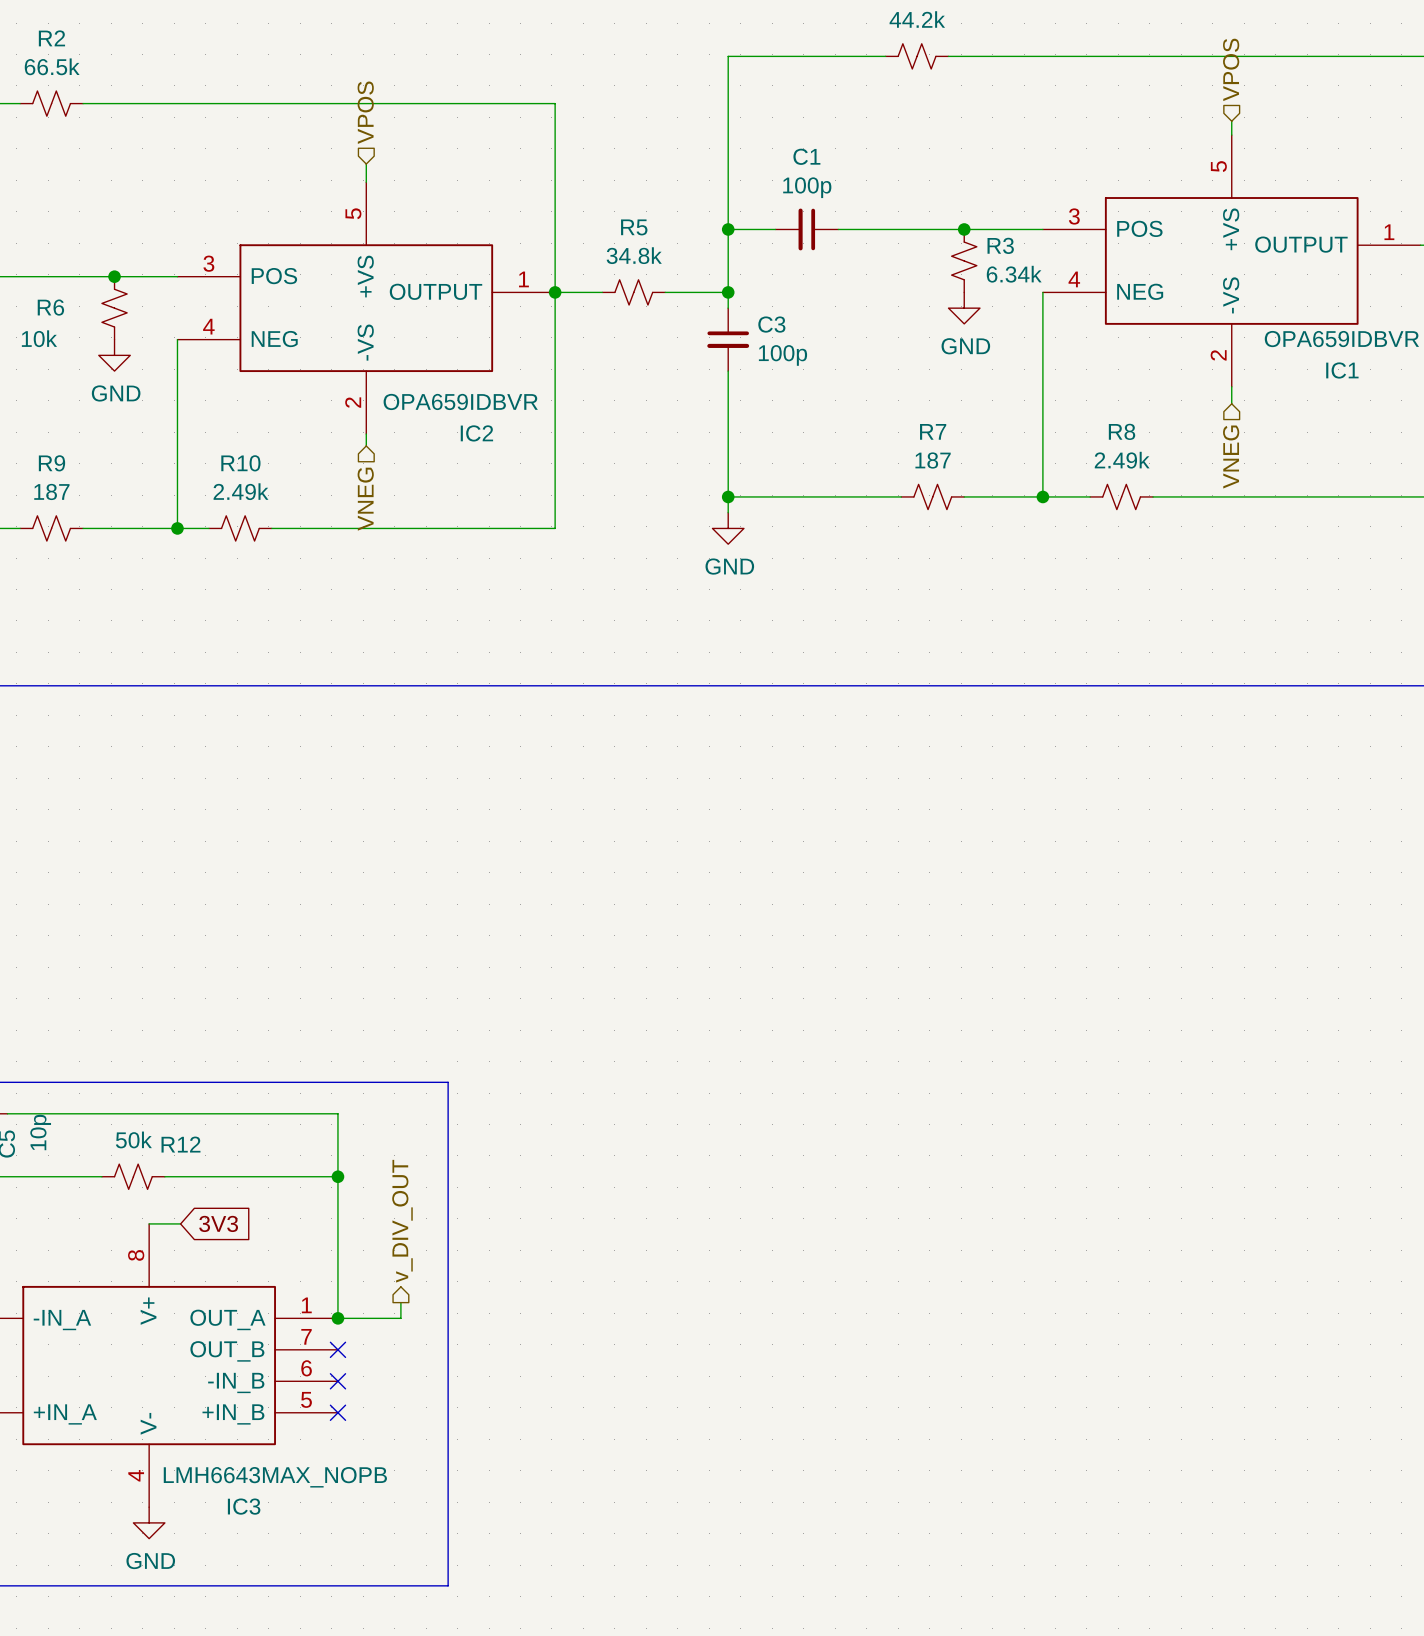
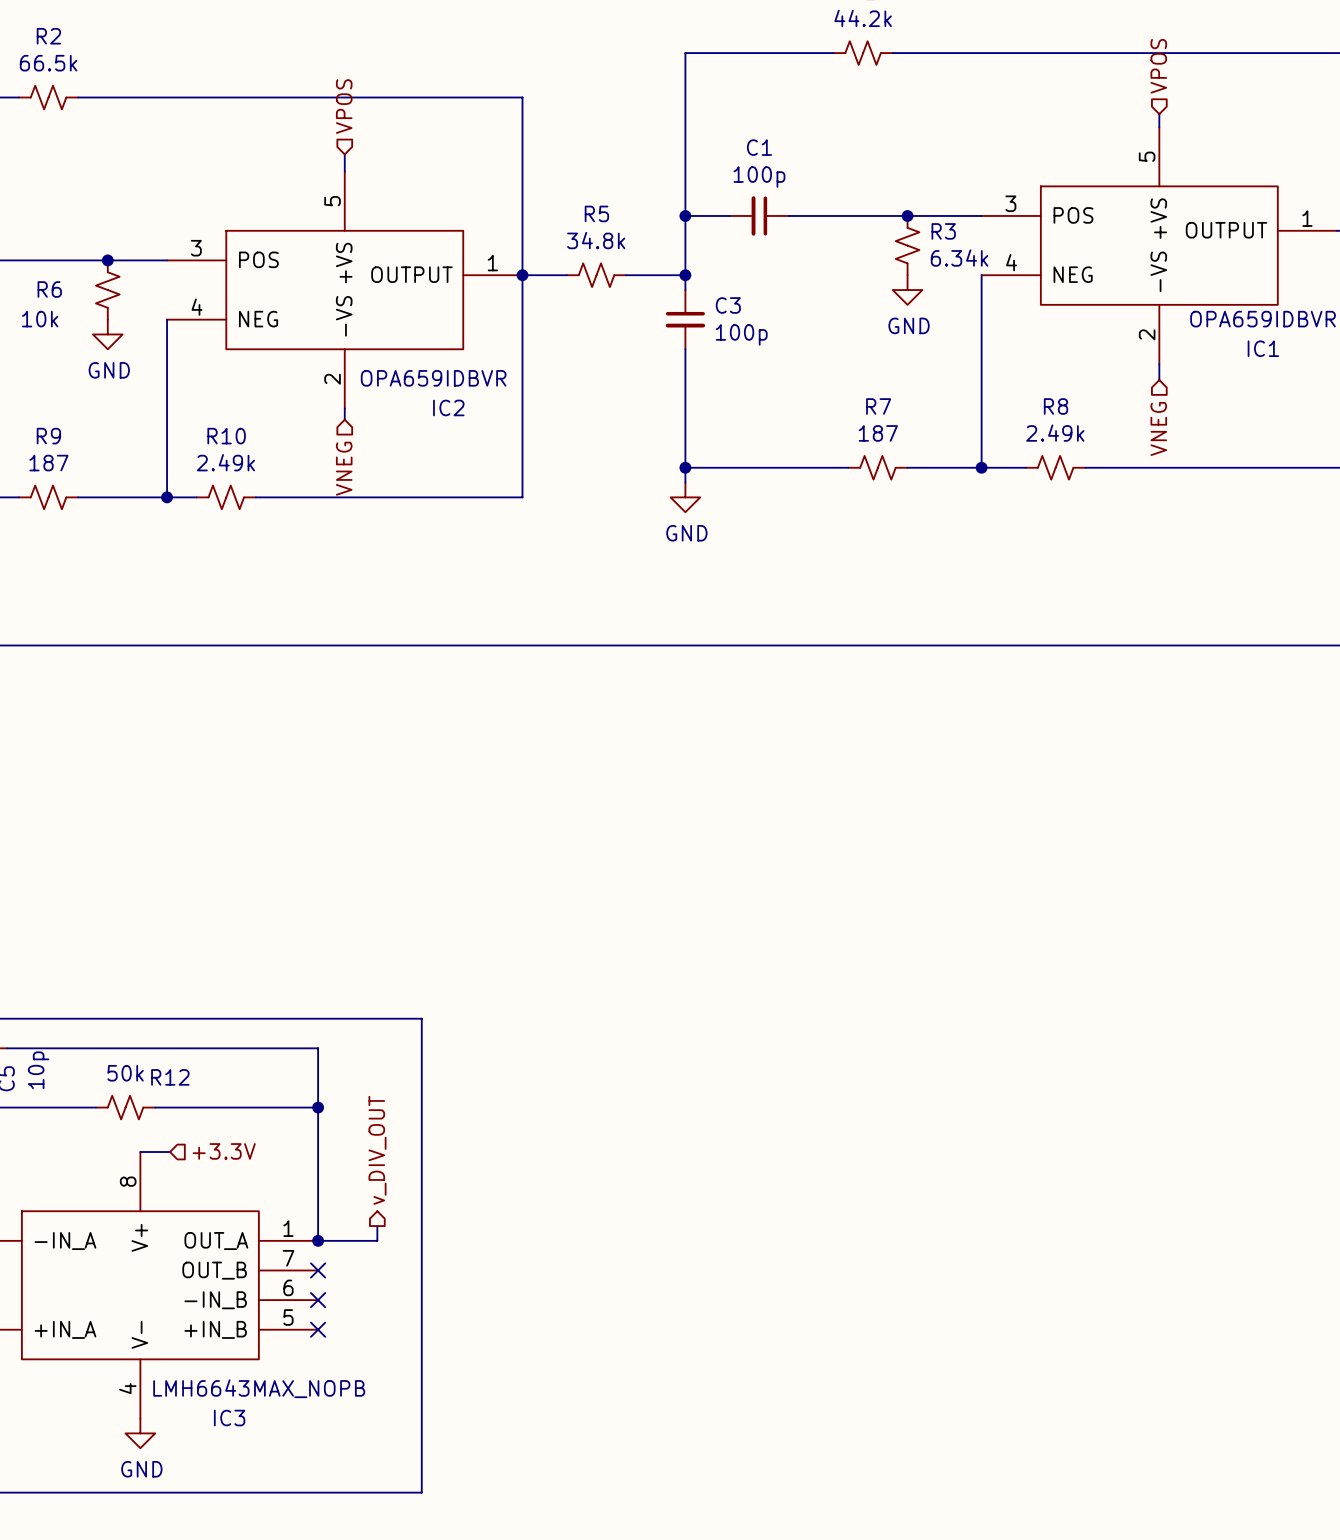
global label: 3V3 (218, 1223) -> none
hierarchical label: none -> +3.3V (224, 1151)

